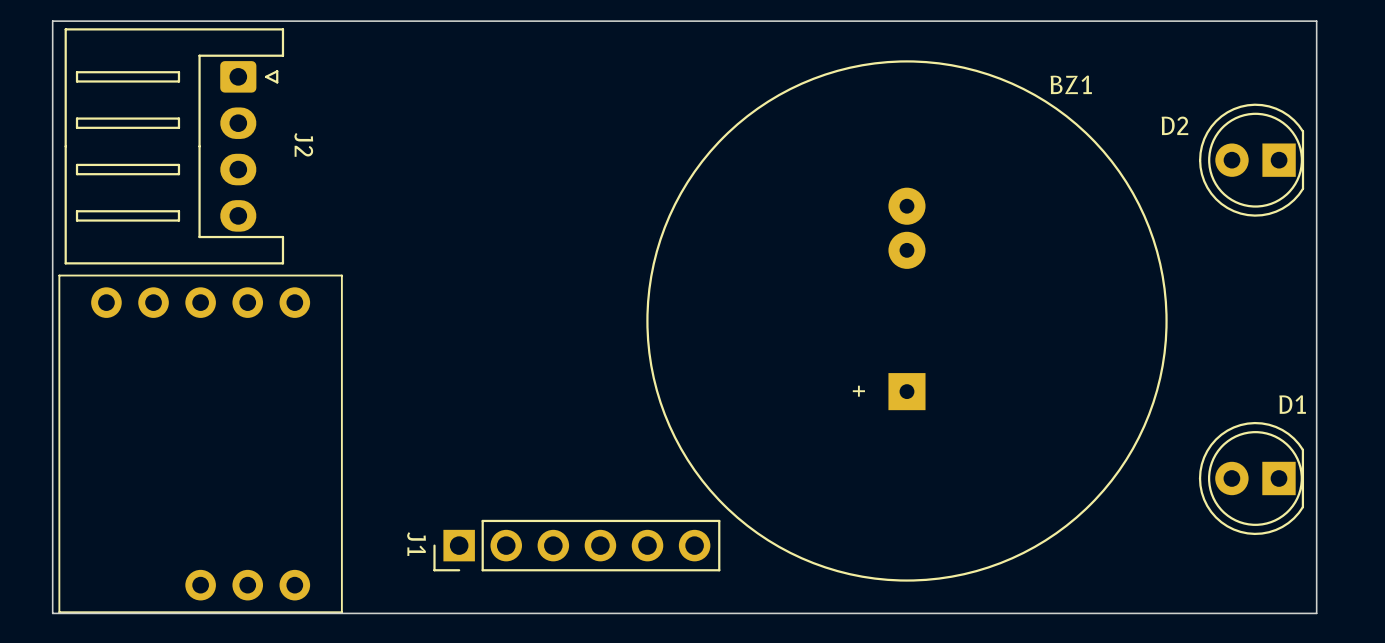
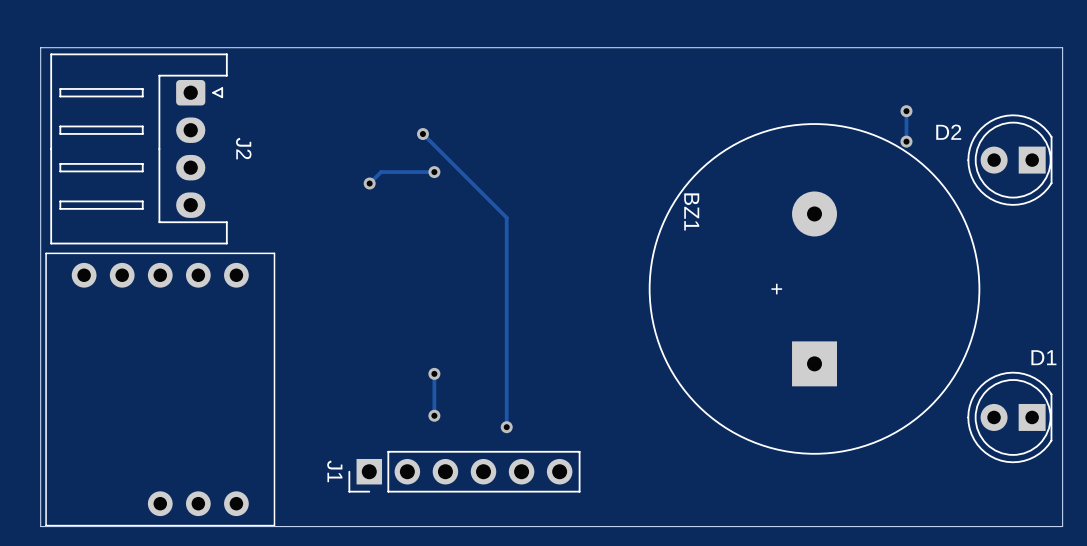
BZ1 footprint: [646, 60, 1168, 582] -> [648, 123, 981, 455]
BZ1 name position: BZ1 (1071, 84) -> BZ1 (691, 211)
track: none -> (906, 111) (906, 141)
via: none -> (906, 111)
track: none -> (422, 134) (506, 217) (506, 427)
via: none -> (422, 134)
via: none -> (906, 141)
track: none -> (434, 172) (381, 172) (369, 183)
via: none -> (434, 172)
via: none -> (369, 183)
track: none -> (434, 373) (434, 415)
via: none -> (434, 373)
via: none -> (434, 415)
via: none -> (506, 427)

